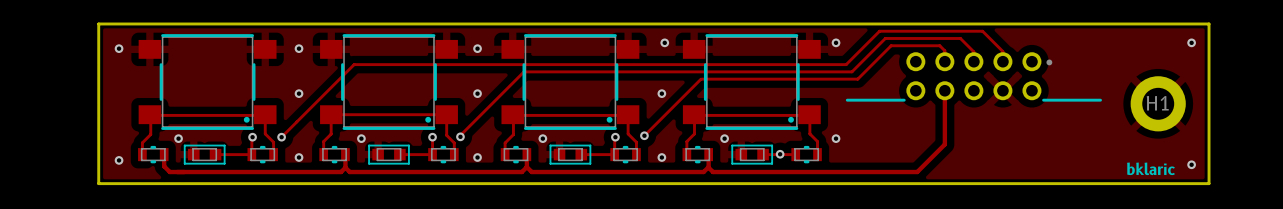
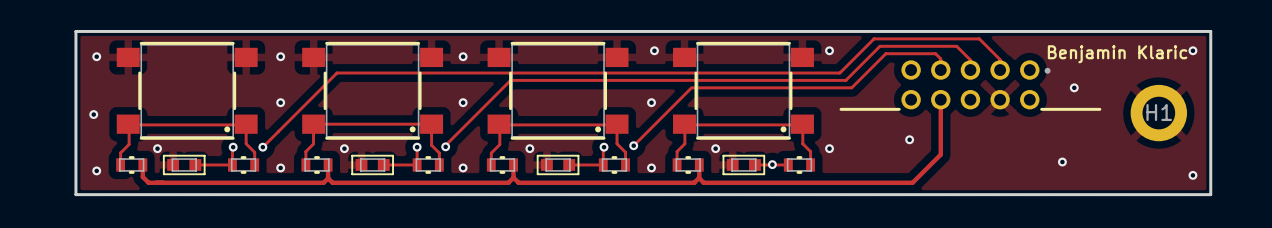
text: none -> Benjamin Klaric (1117, 54)
via: none -> (1074, 87)
via: none -> (93, 114)
via: none -> (909, 139)
via: none -> (1062, 162)
text: bklaric (1151, 168) -> none

